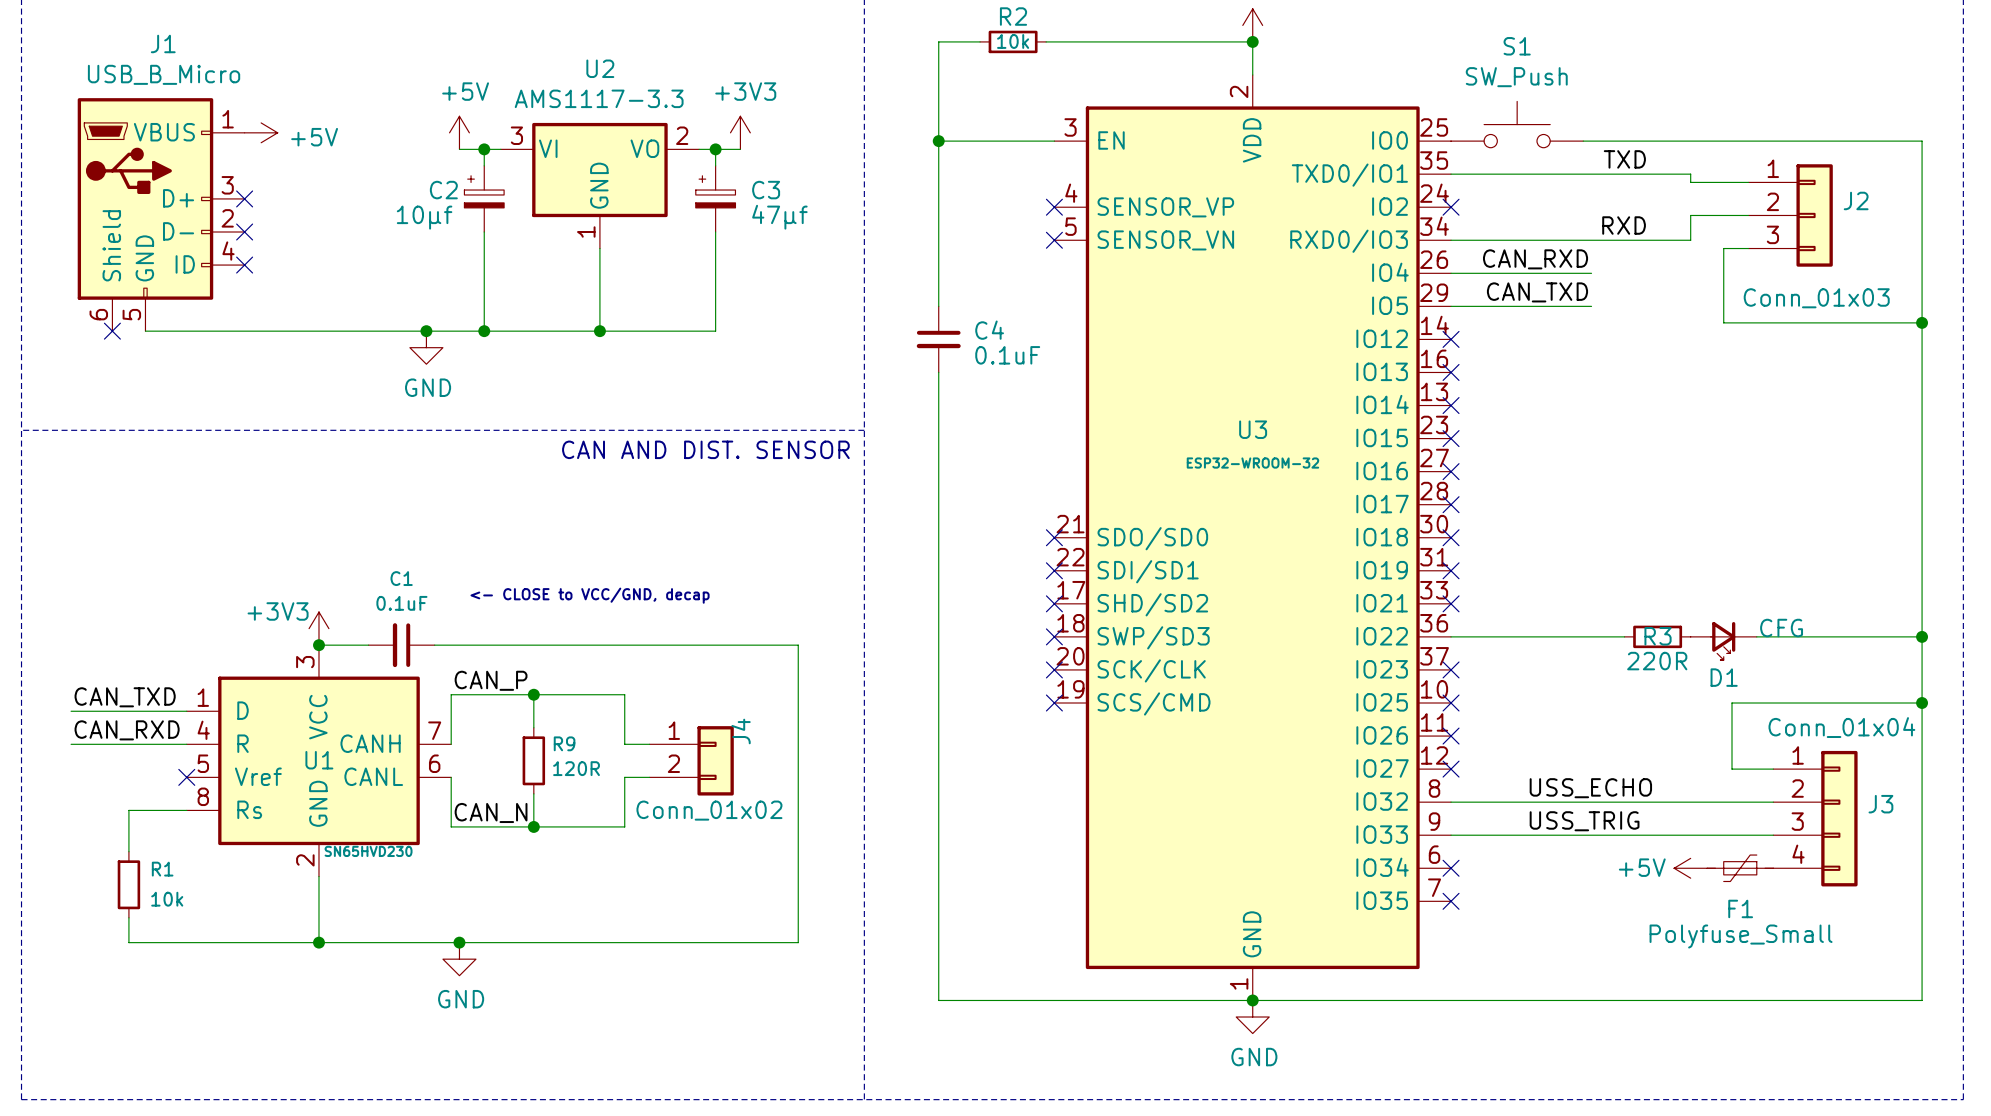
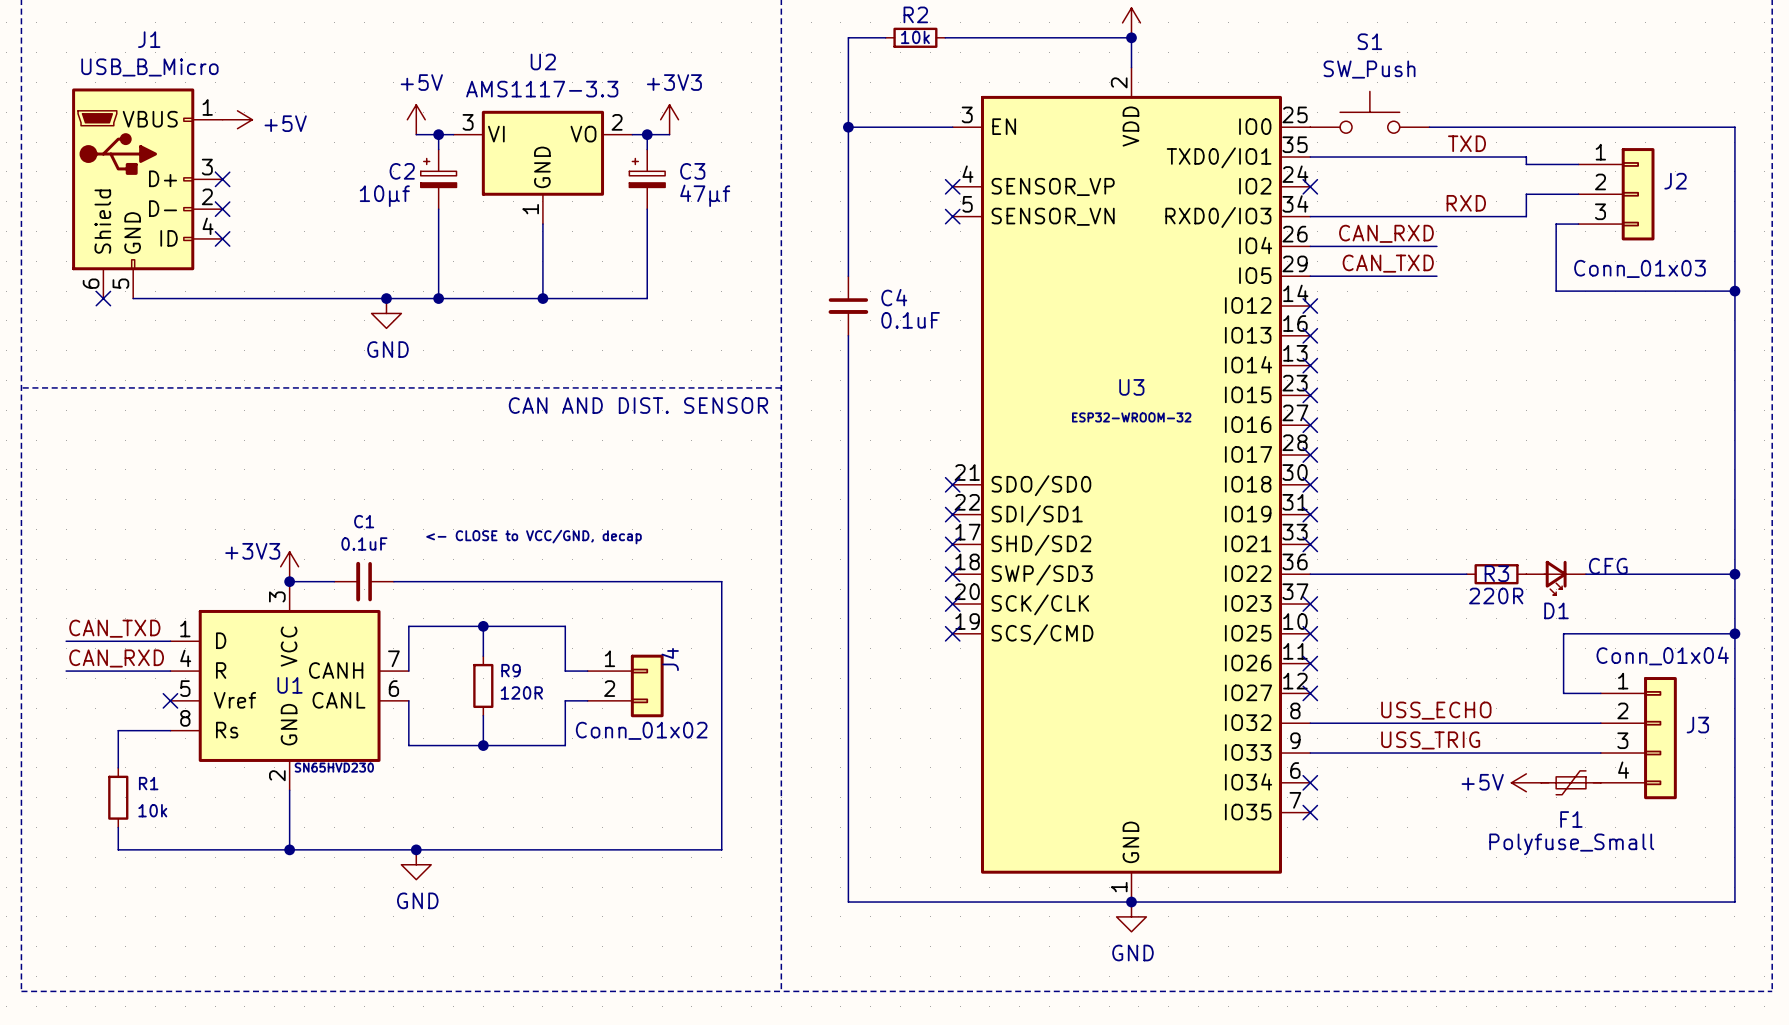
label: CAN_P (491, 680) -> none
label: CAN_N (491, 812) -> none

